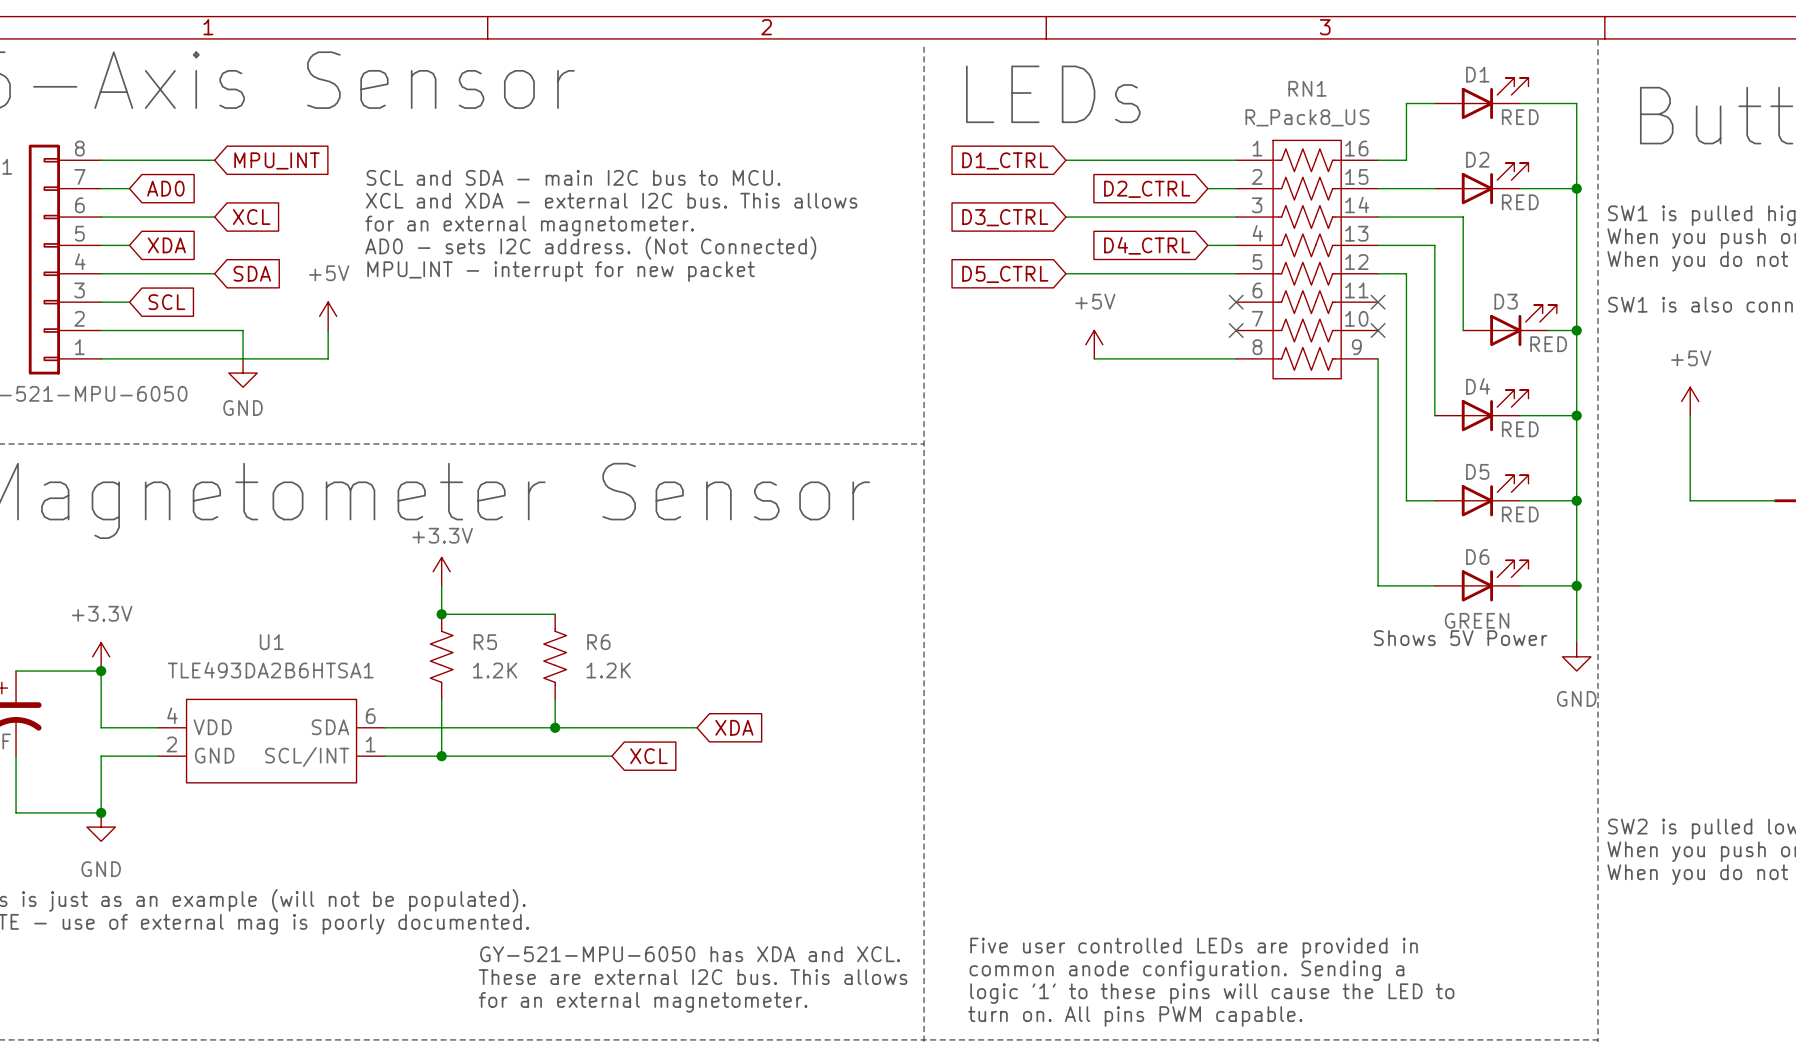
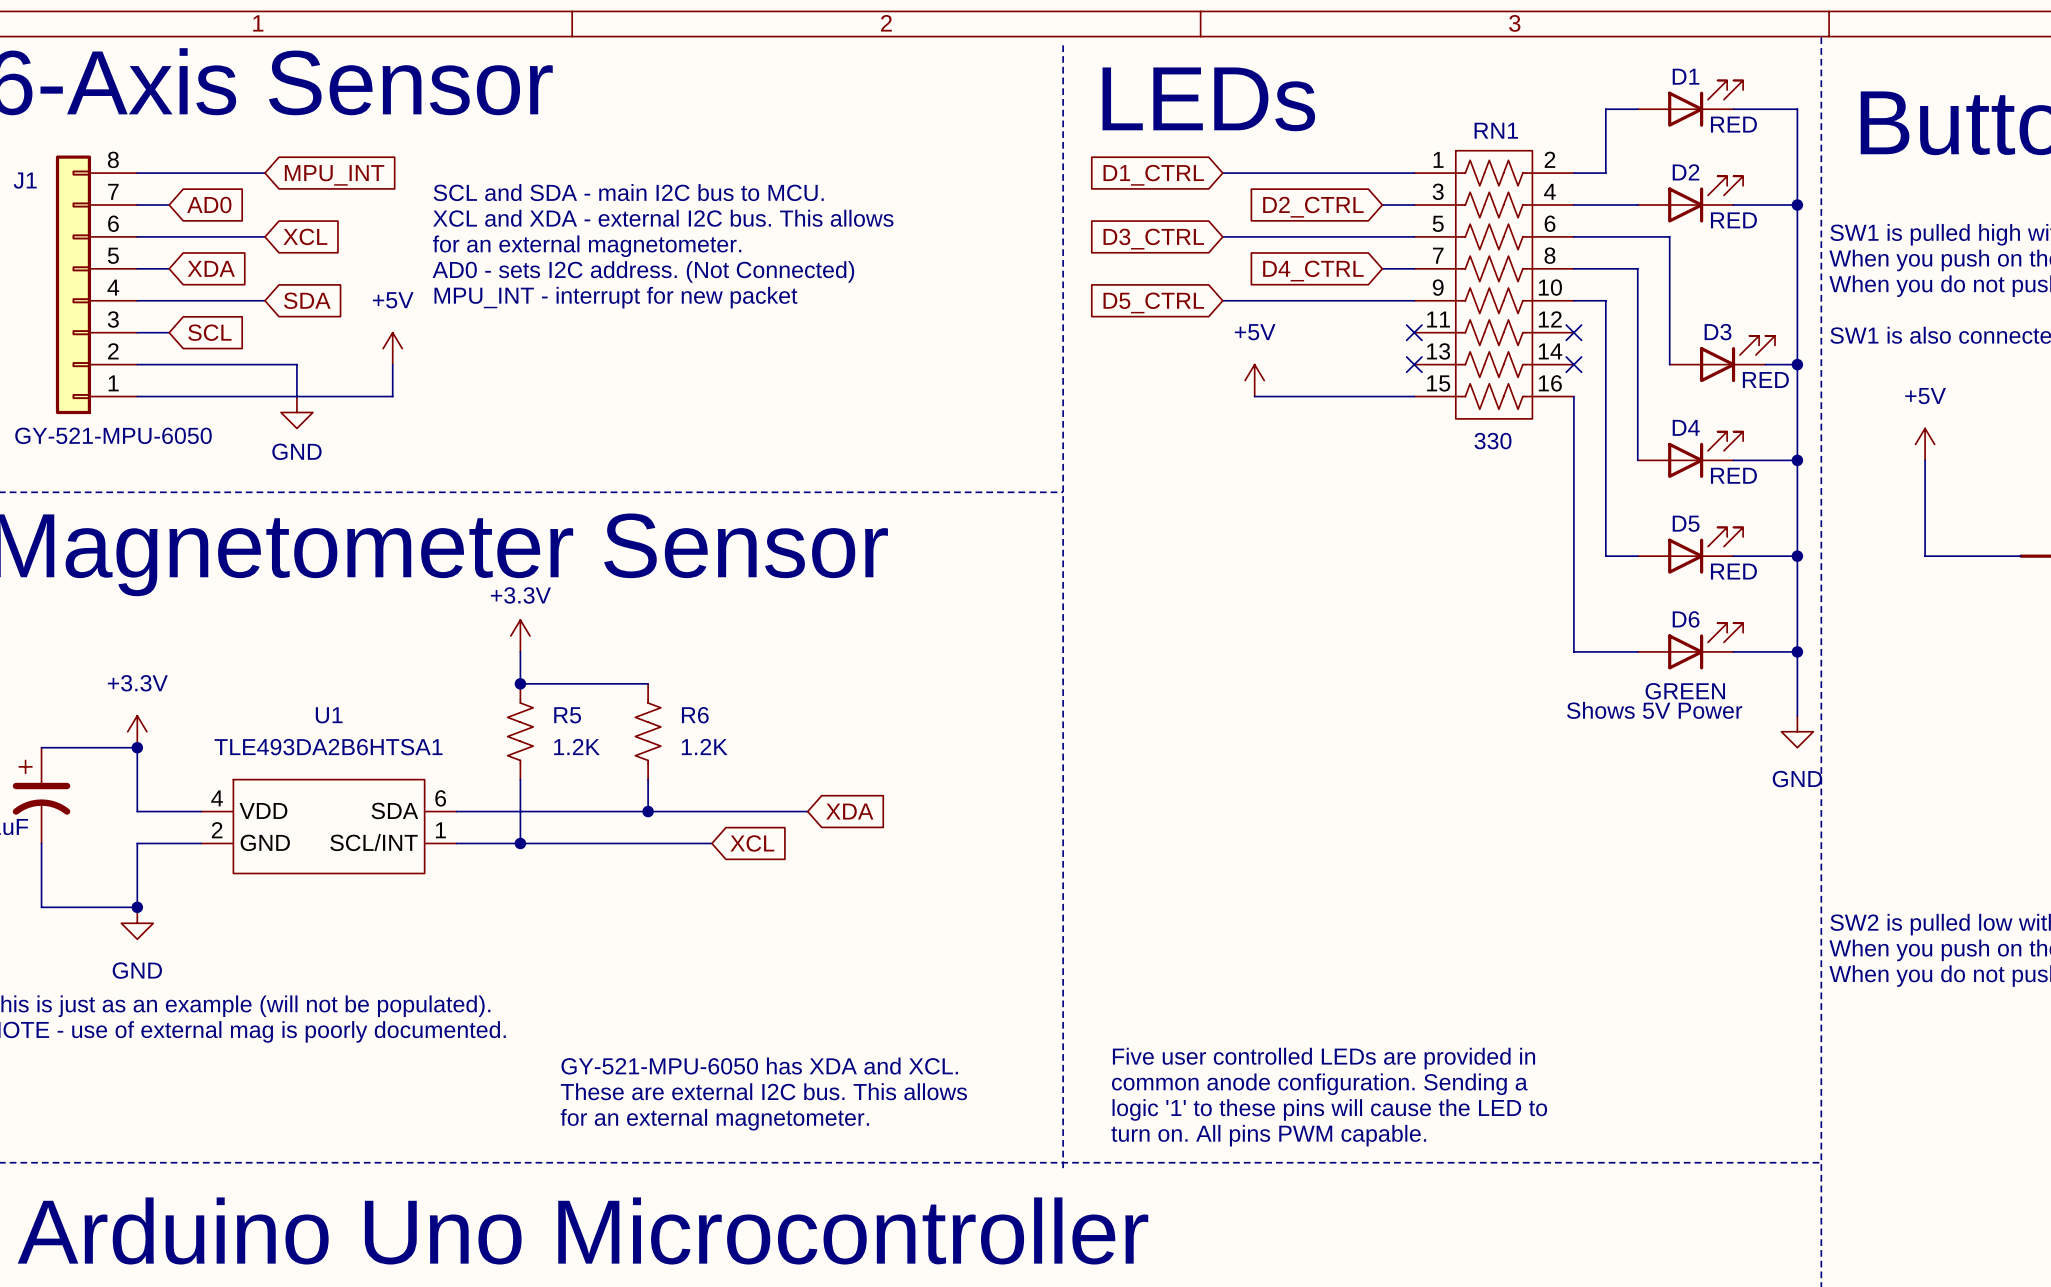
RN1 name position: RN1 (1307, 88) -> RN1 (1496, 130)
RN1 value: R_Pack8_US (1307, 117) -> 330 (1493, 441)
RN1 symbol: [1236, 140, 1379, 379] -> [1414, 150, 1574, 419]

